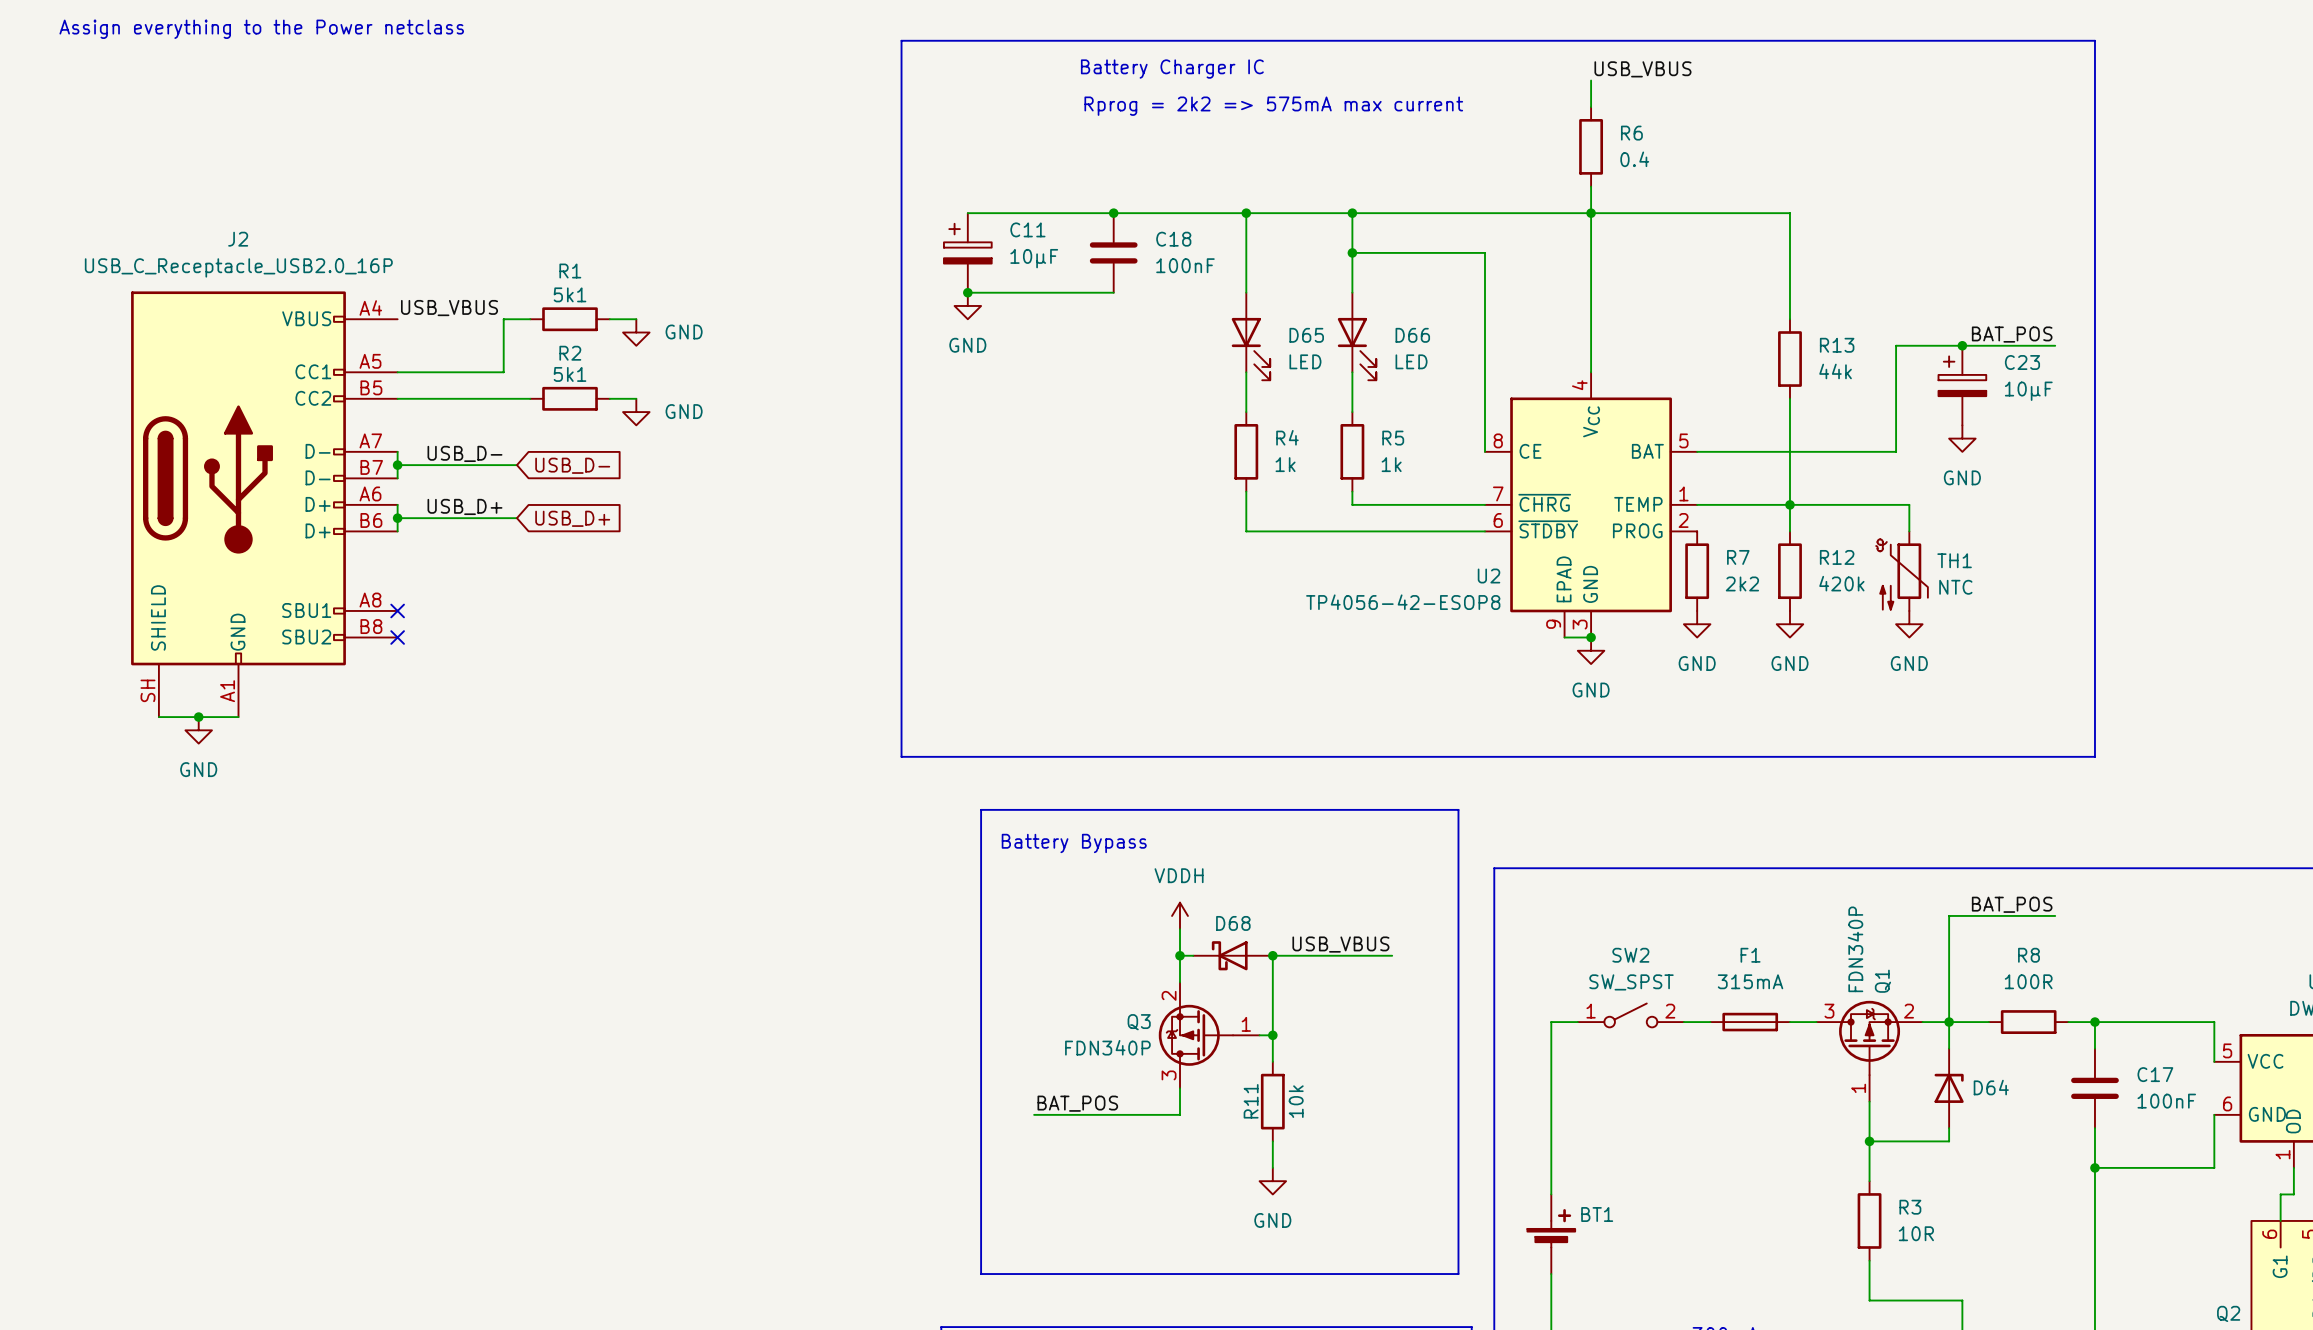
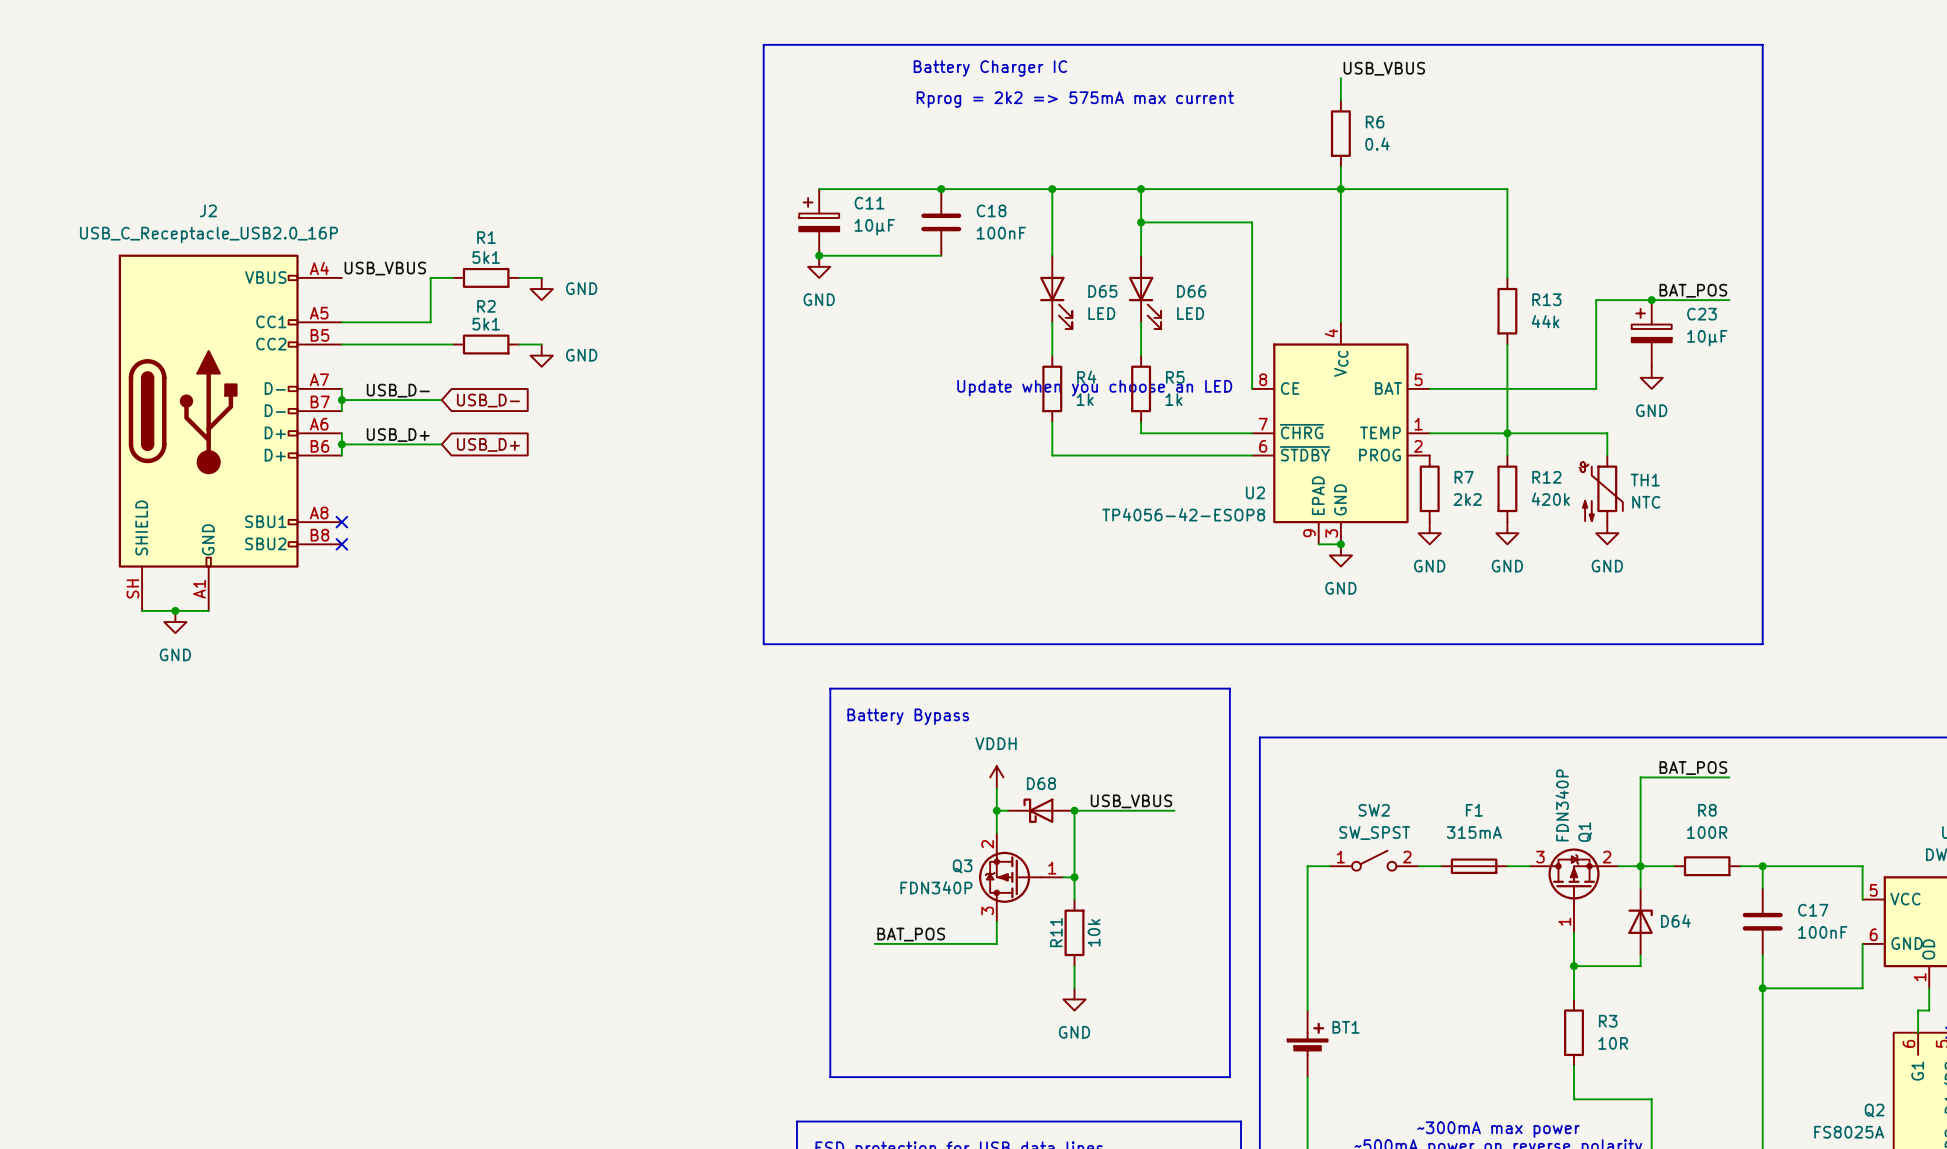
text: Assign everything to the Power netclass (261, 29) -> none
text: none -> Update when you choose an LED (1094, 388)

